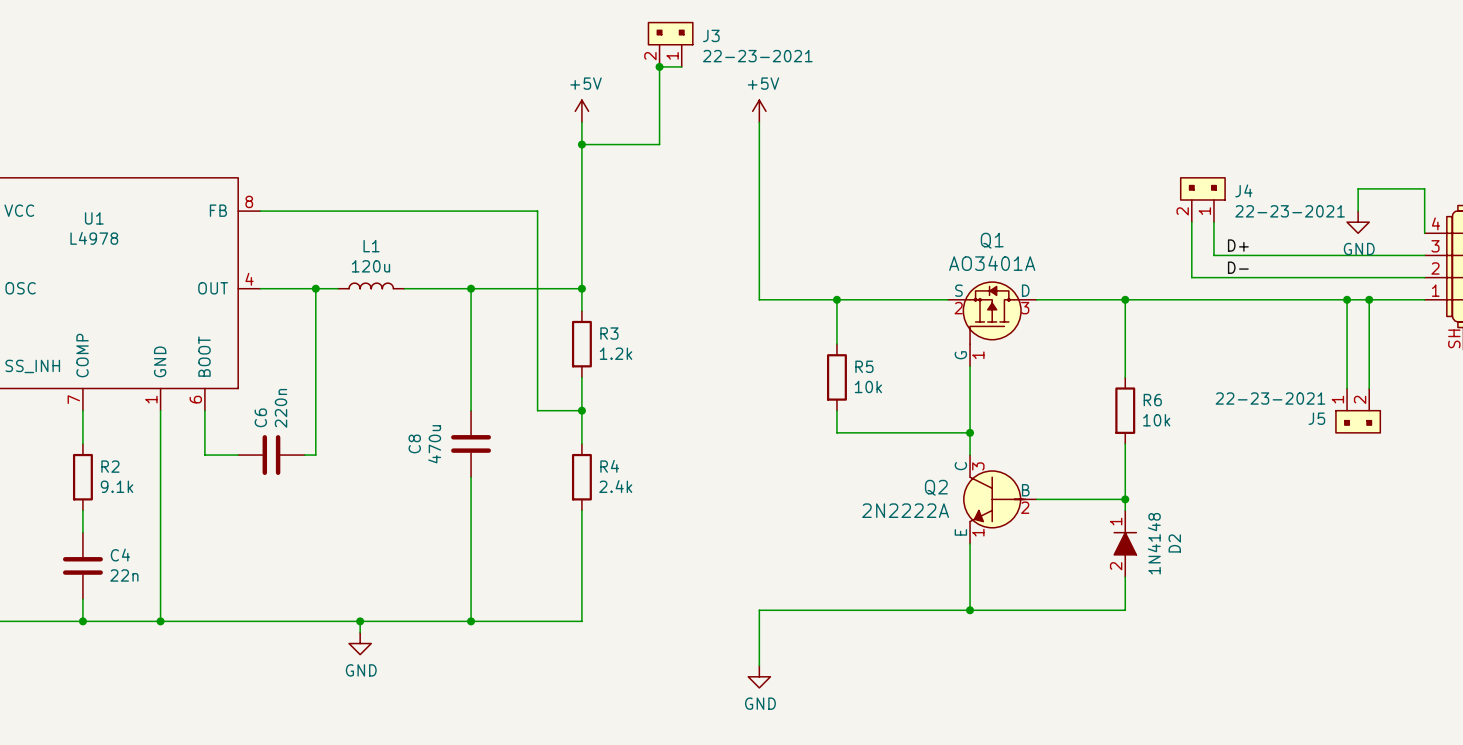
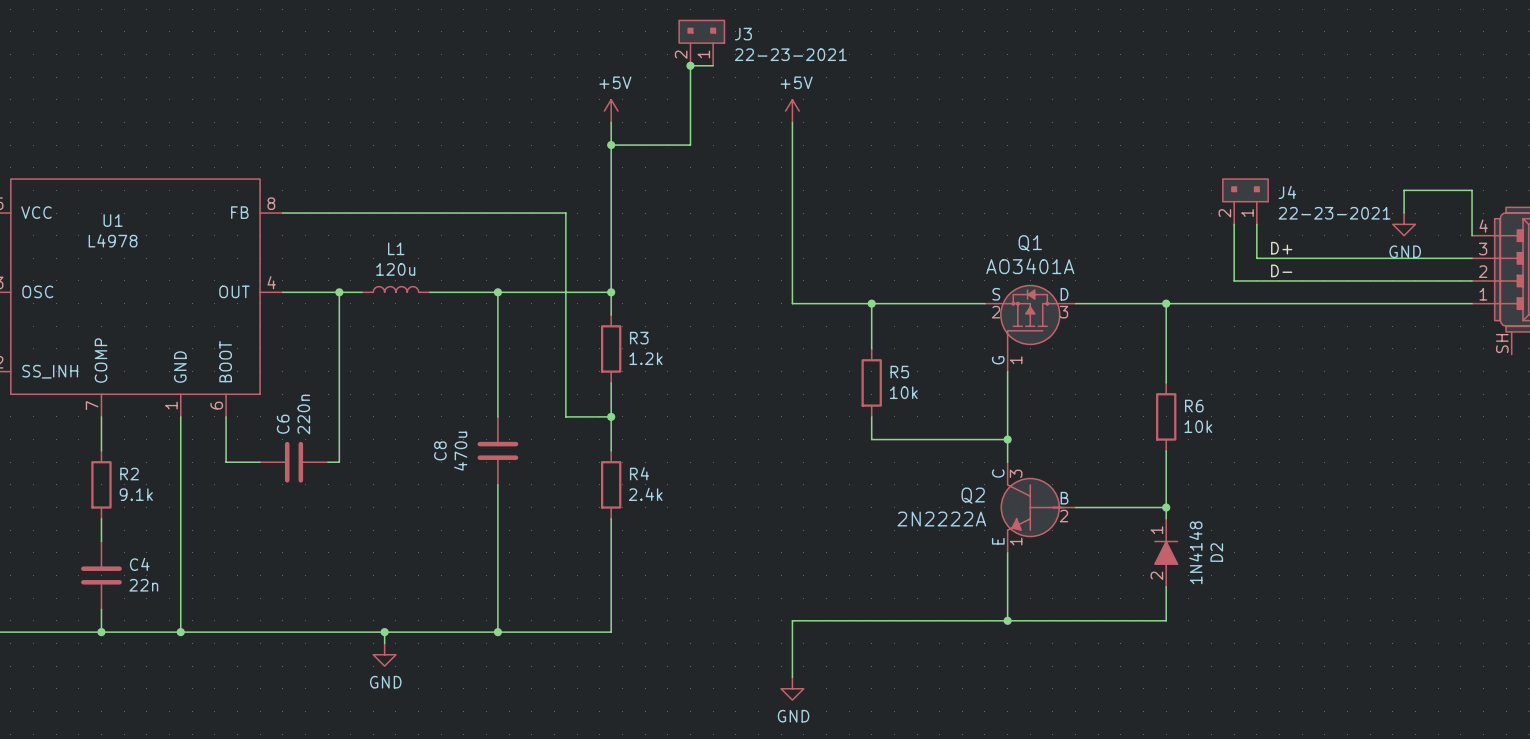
wire: (1347, 299) (1347, 388) -> none
junction: (1347, 299) -> none
wire: (1369, 299) (1369, 388) -> none
junction: (1369, 299) -> none
J5: 22-23-2021 (1358, 410) -> none

